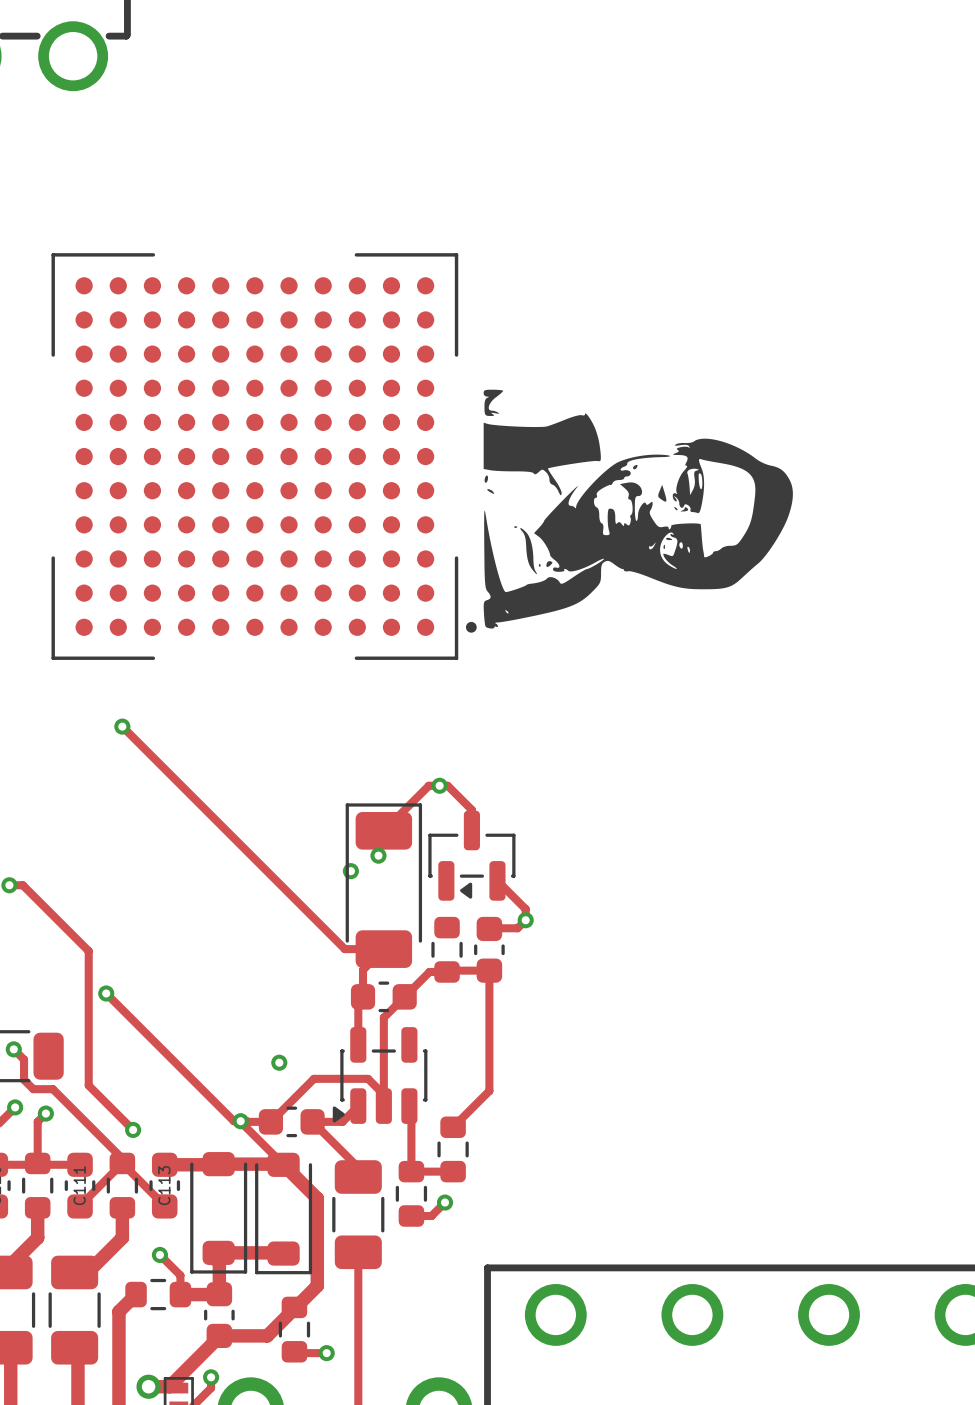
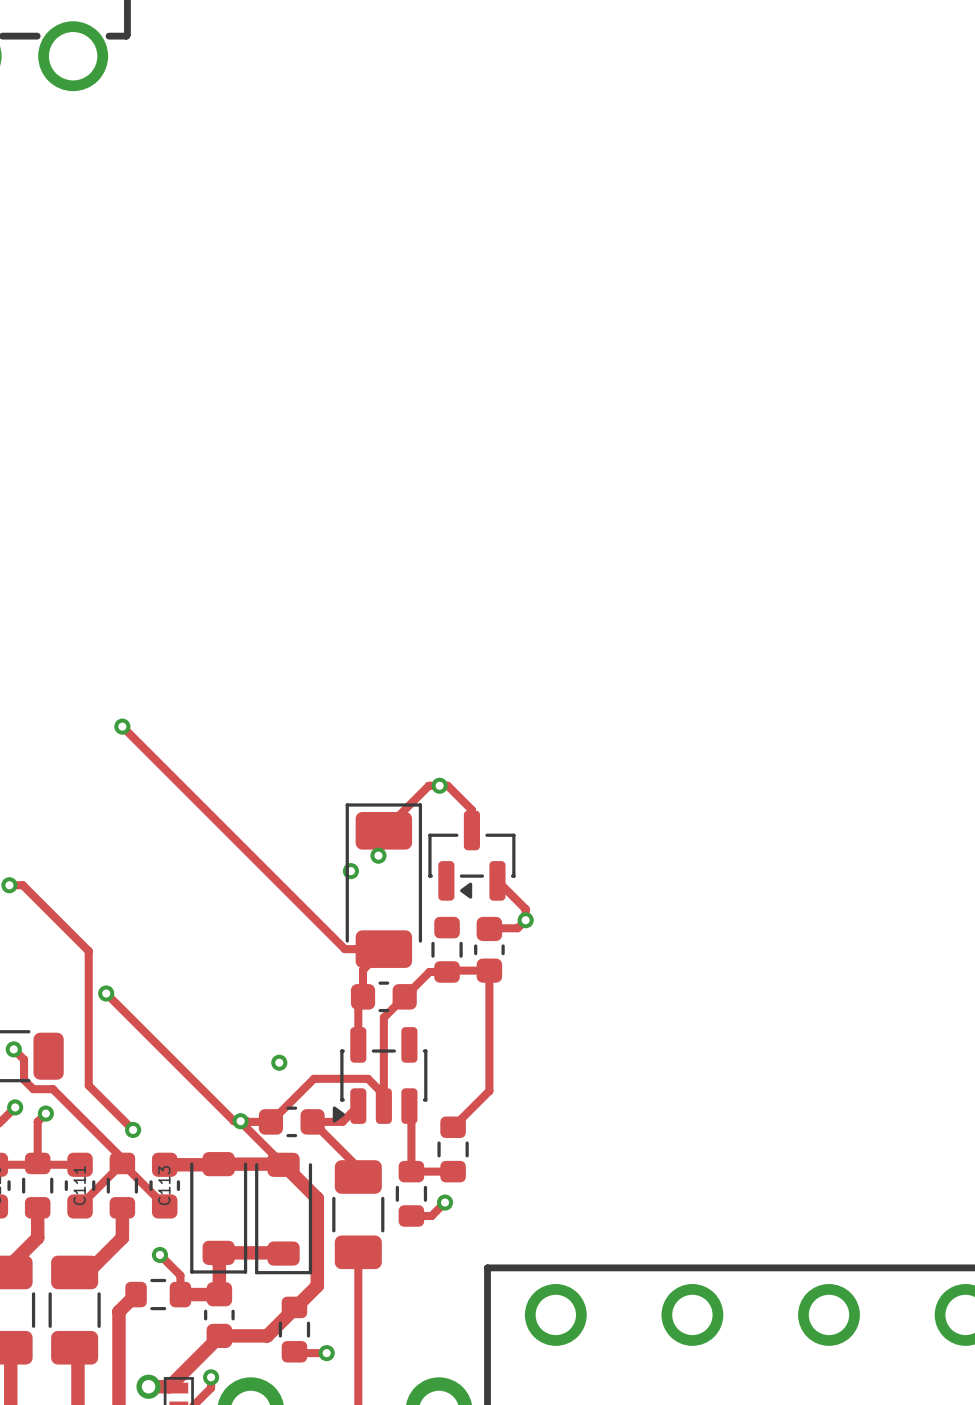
drawing: [483, 389, 793, 629] -> none
part: (264, 456) -> none

